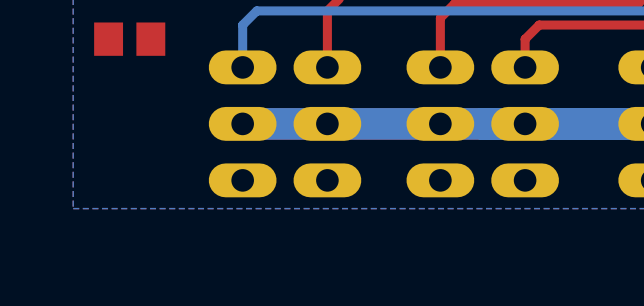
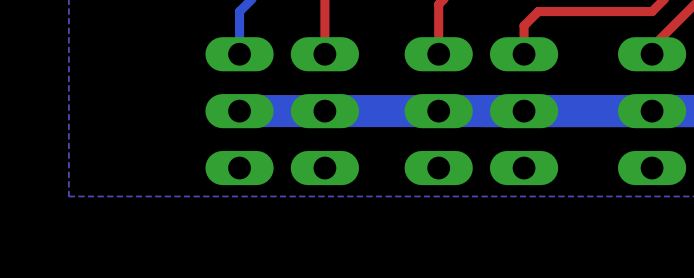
part: (129, 39) -> none

